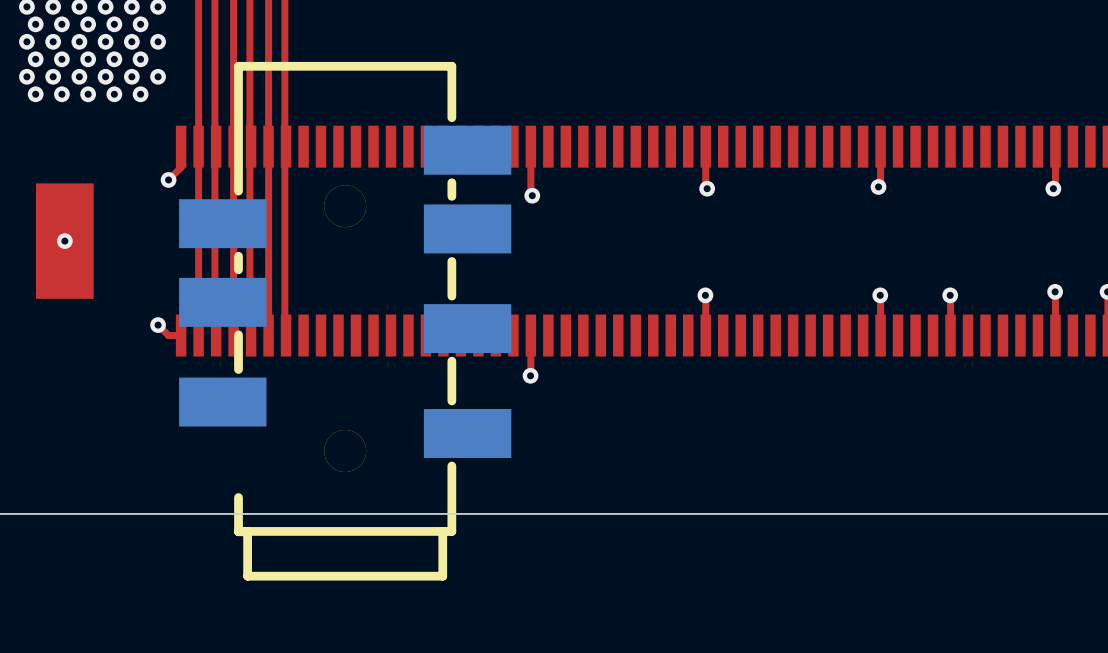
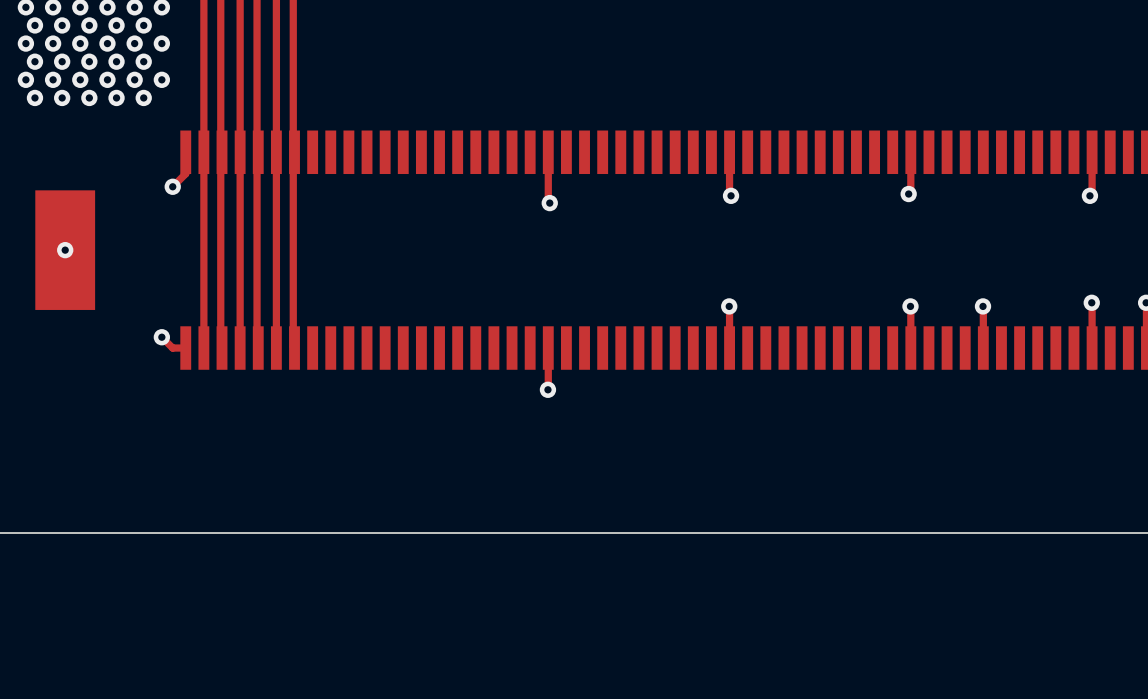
part: (345, 321) -> none

